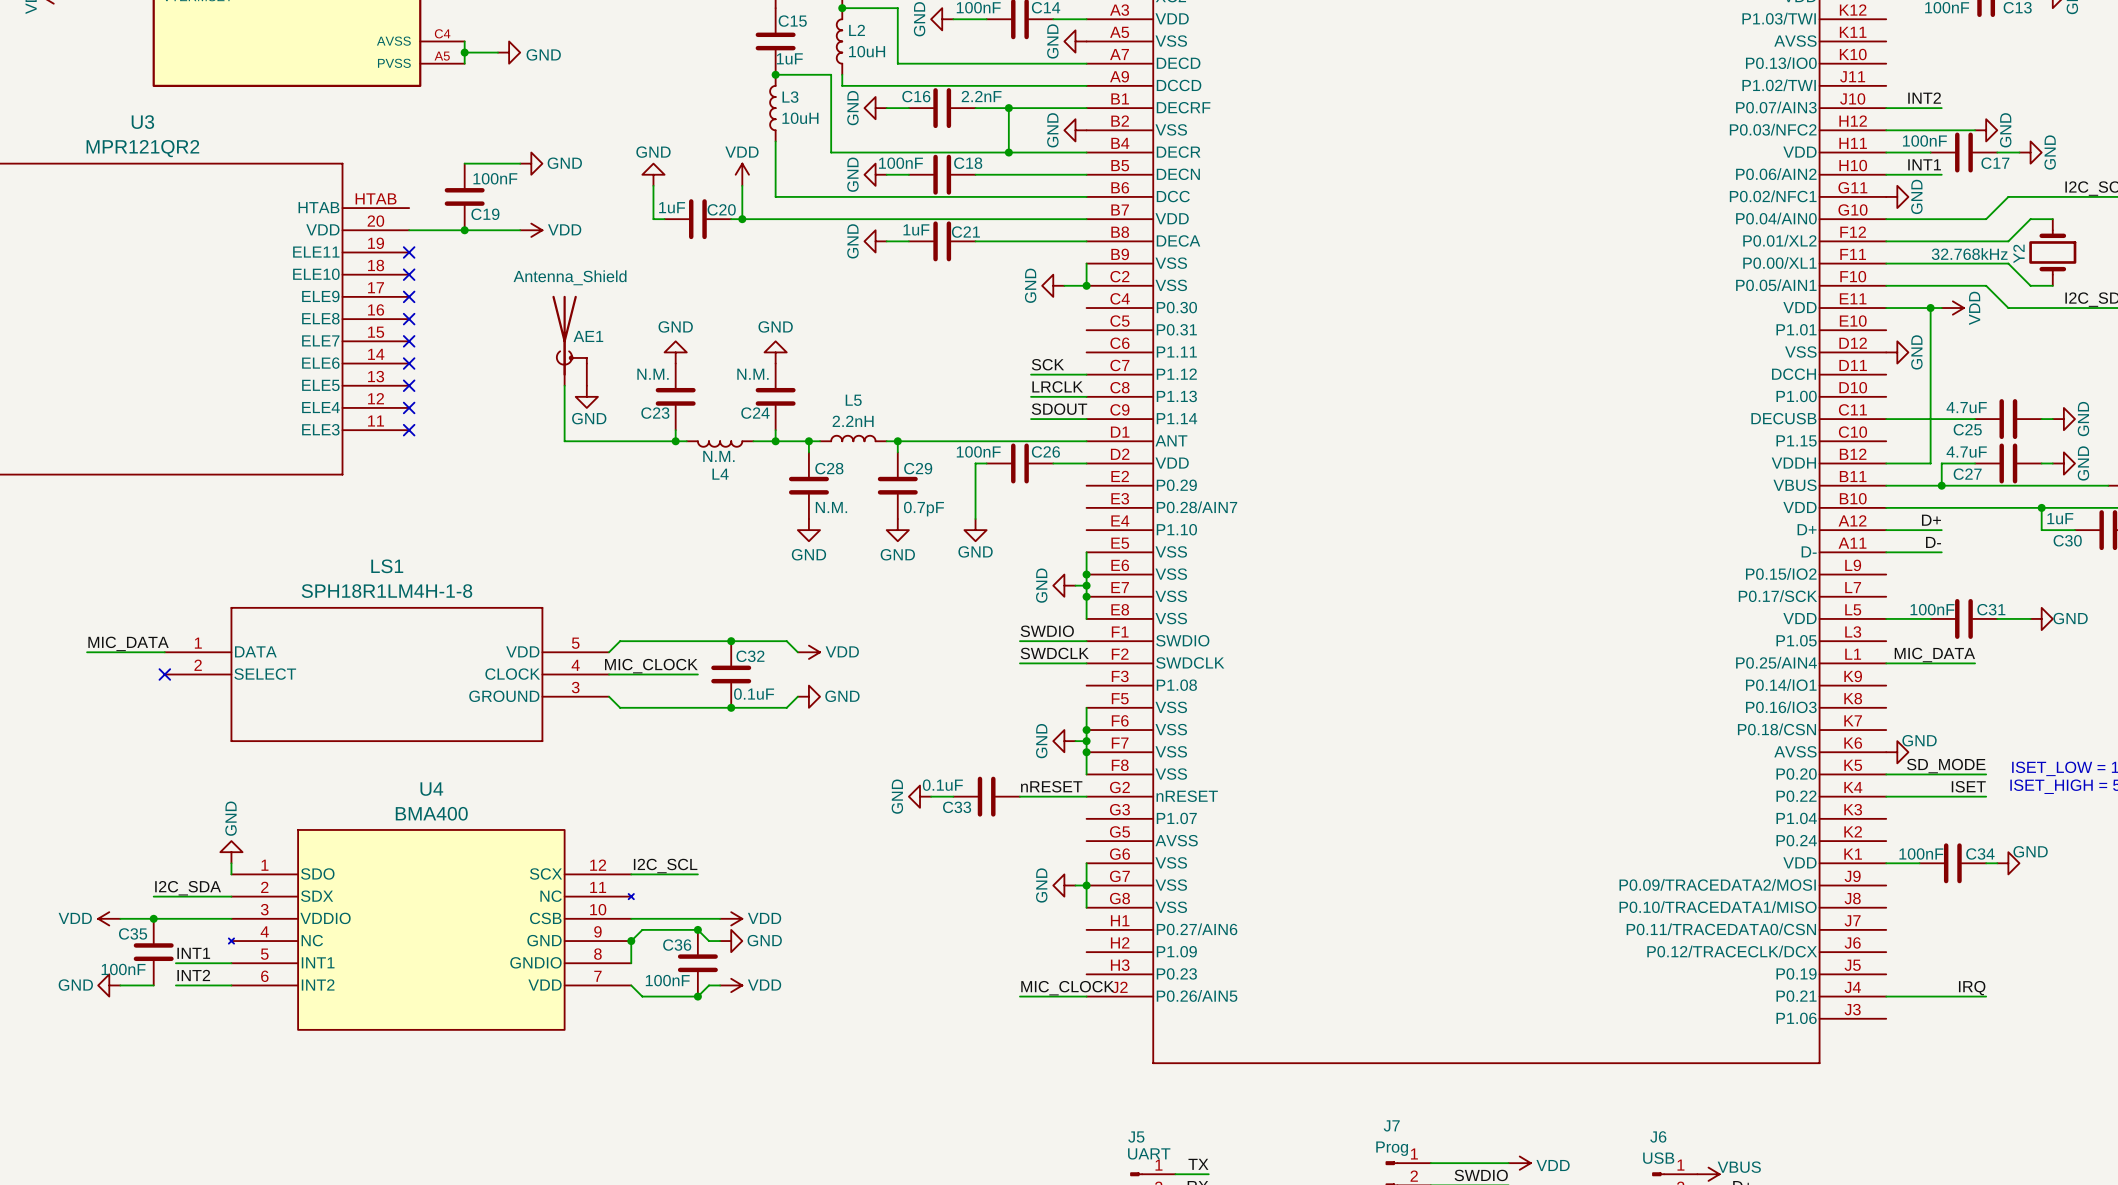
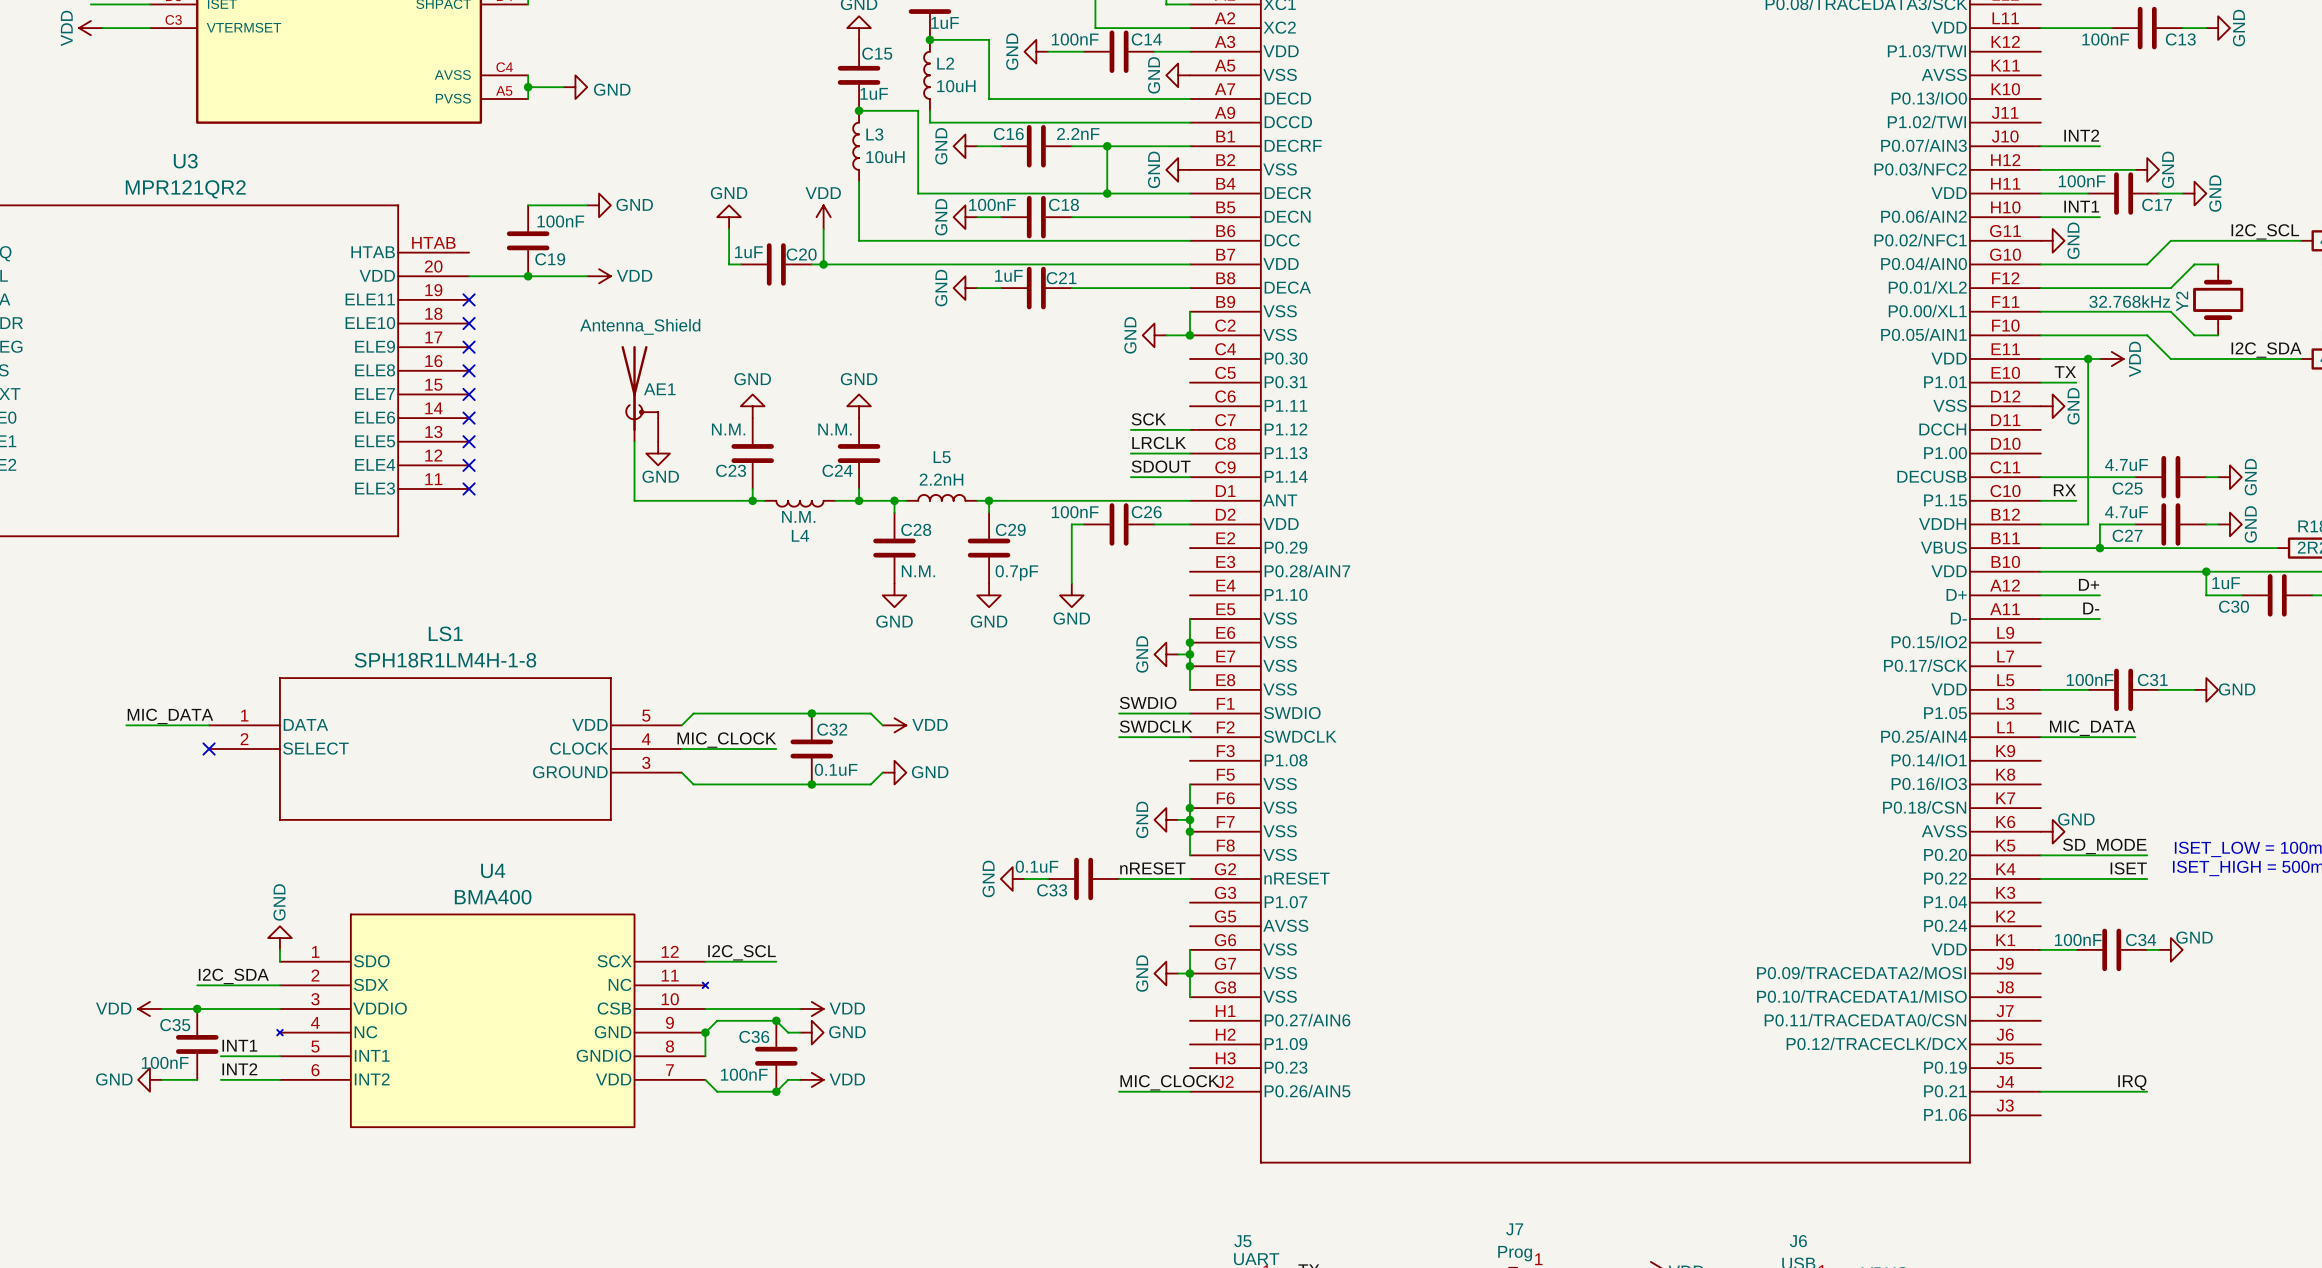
label: none -> TX (2065, 372)
wire: none -> (2040, 382) (2076, 382)
label: none -> RX (2064, 490)
wire: none -> (2040, 500) (2076, 500)

